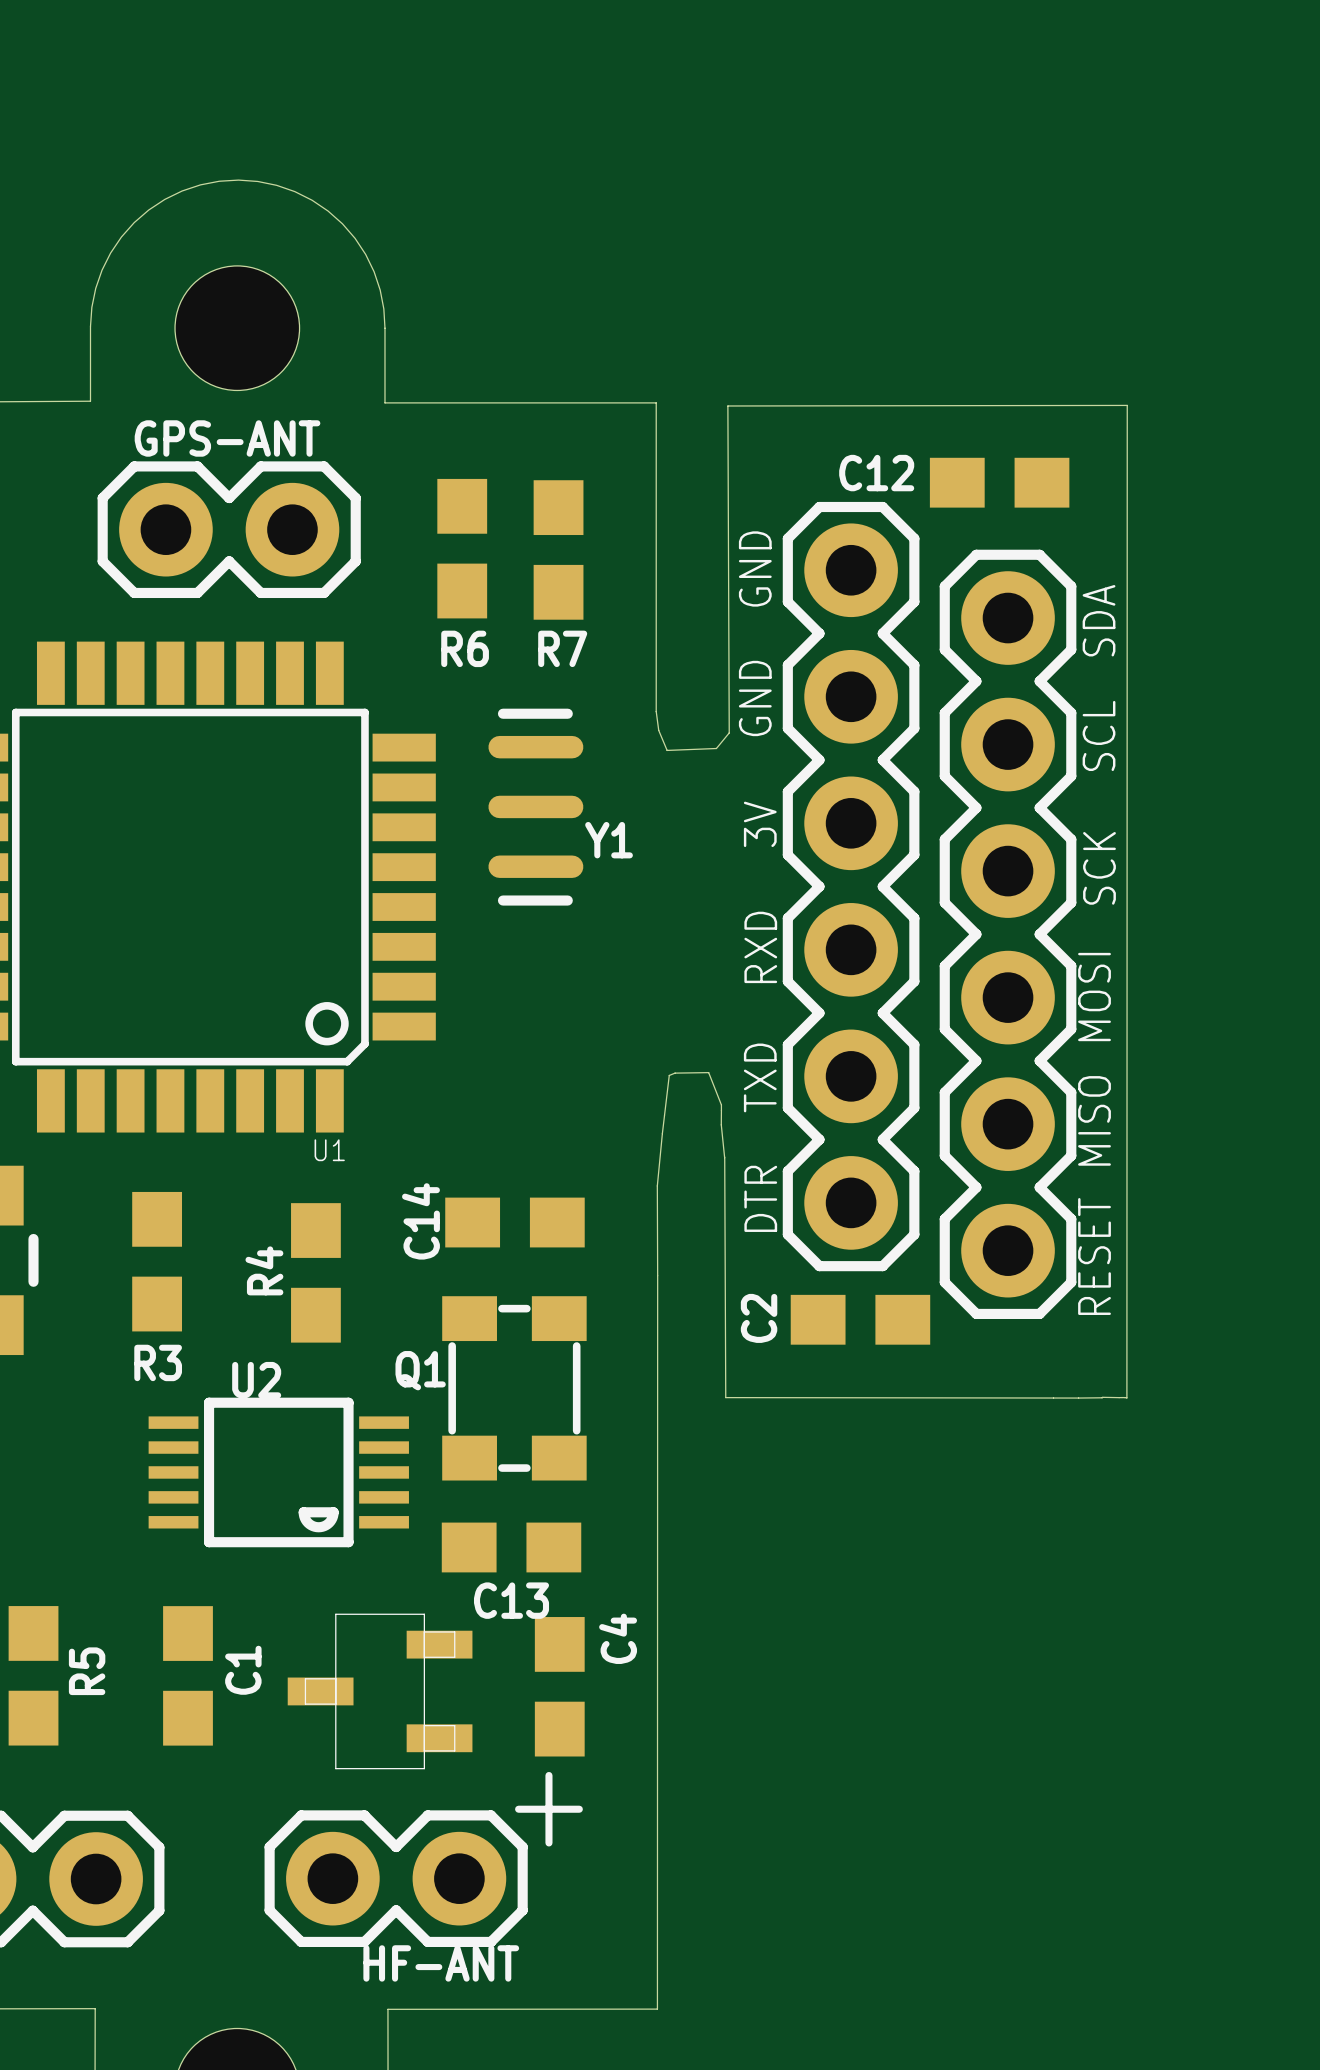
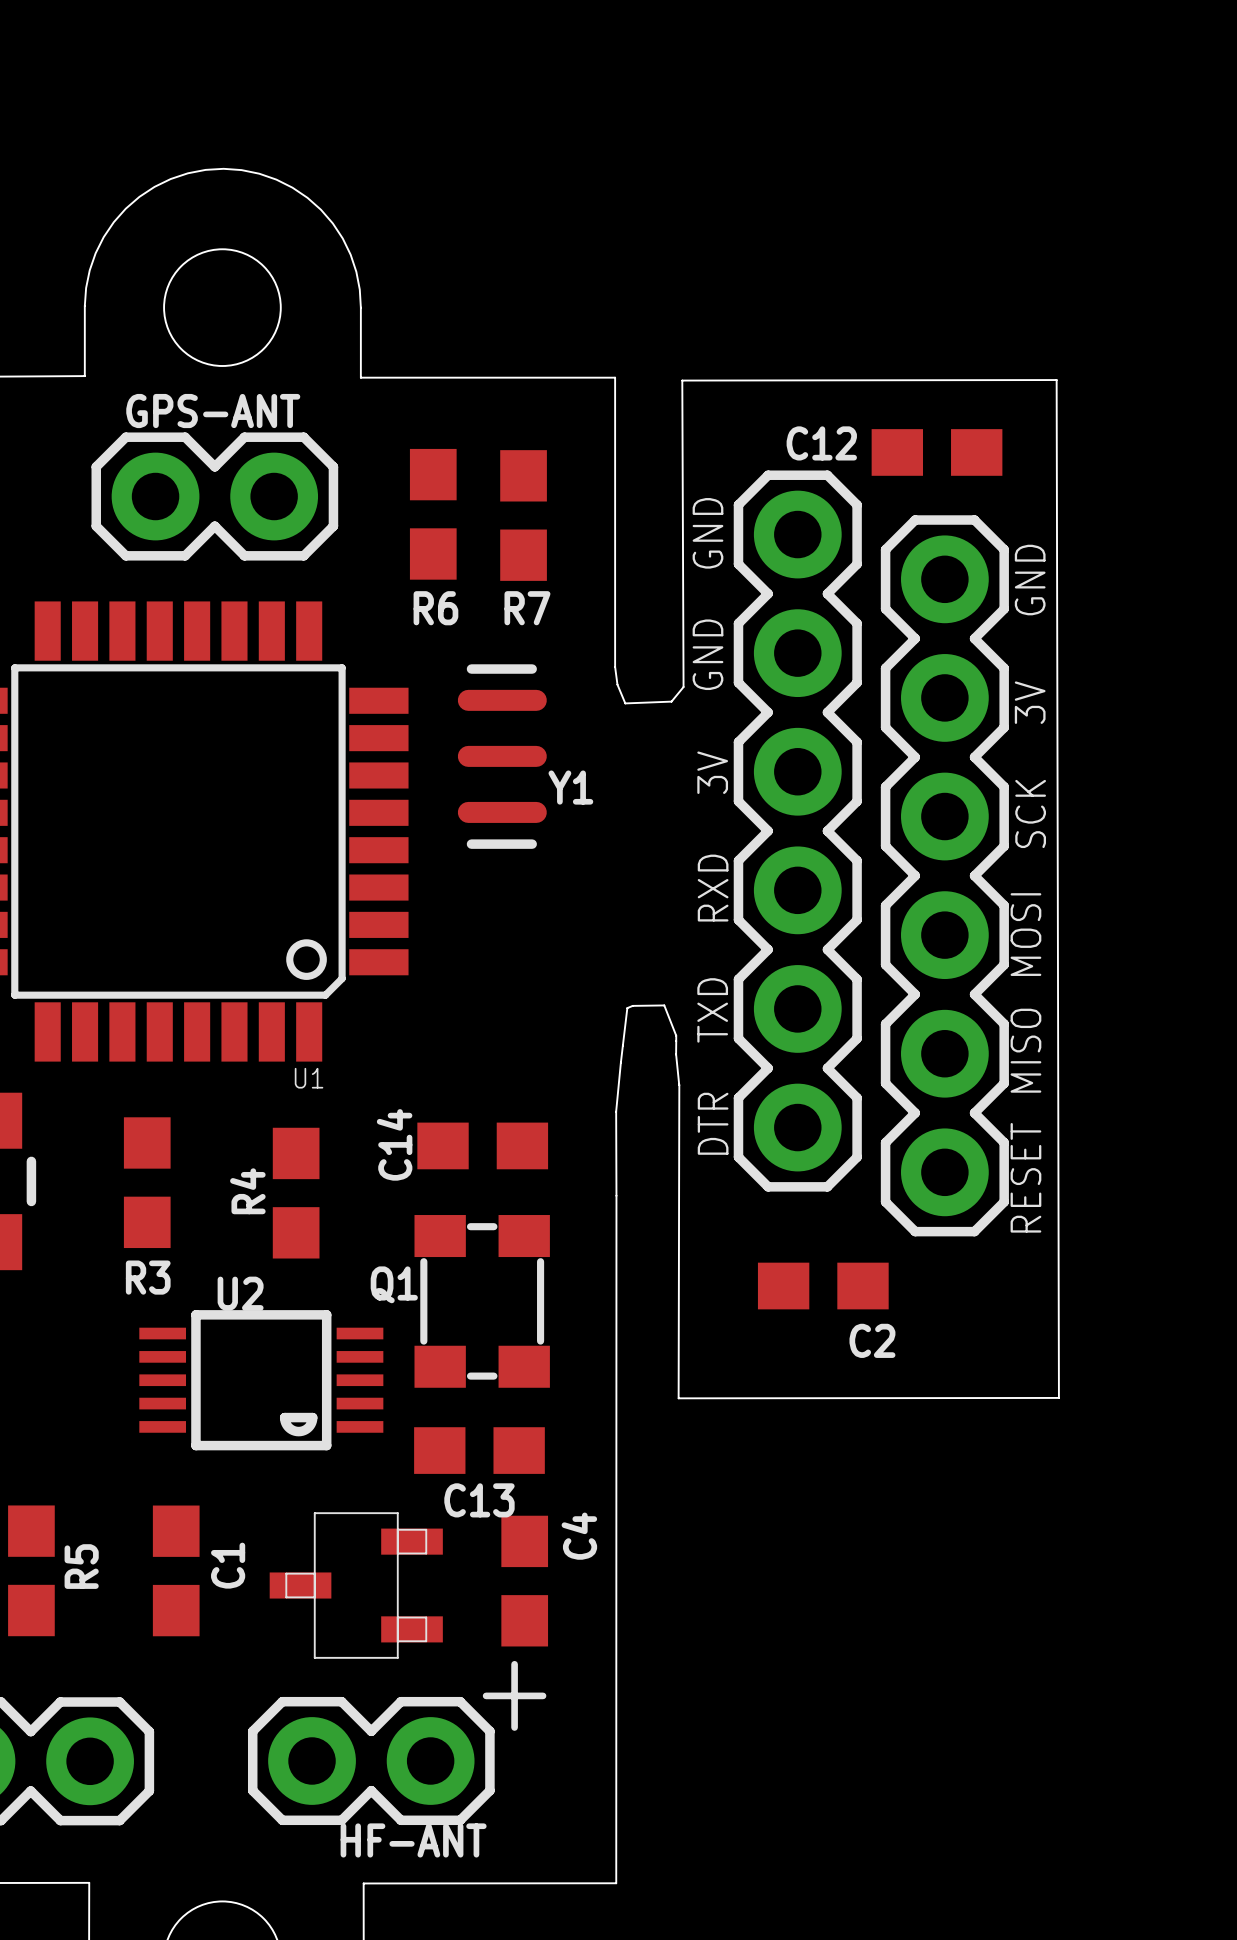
board edge: (1127, 405) (1126, 1397) (1102, 1397) -> (1056, 380) (1058, 1397) (678, 1398) (679, 1085)
text: SDA (1099, 620) -> GND (1030, 580)
text: SCL (1099, 735) -> 3V (1030, 702)
board edge: (724, 1157) (725, 1397) (1102, 1397) -> none
C2 name rotation: 0° (759, 1318) -> 90° clockwise (872, 1340)
C2 name position: C2 (759, 1318) -> C2 (872, 1340)
C2 position: (860, 1319) -> (823, 1286)

